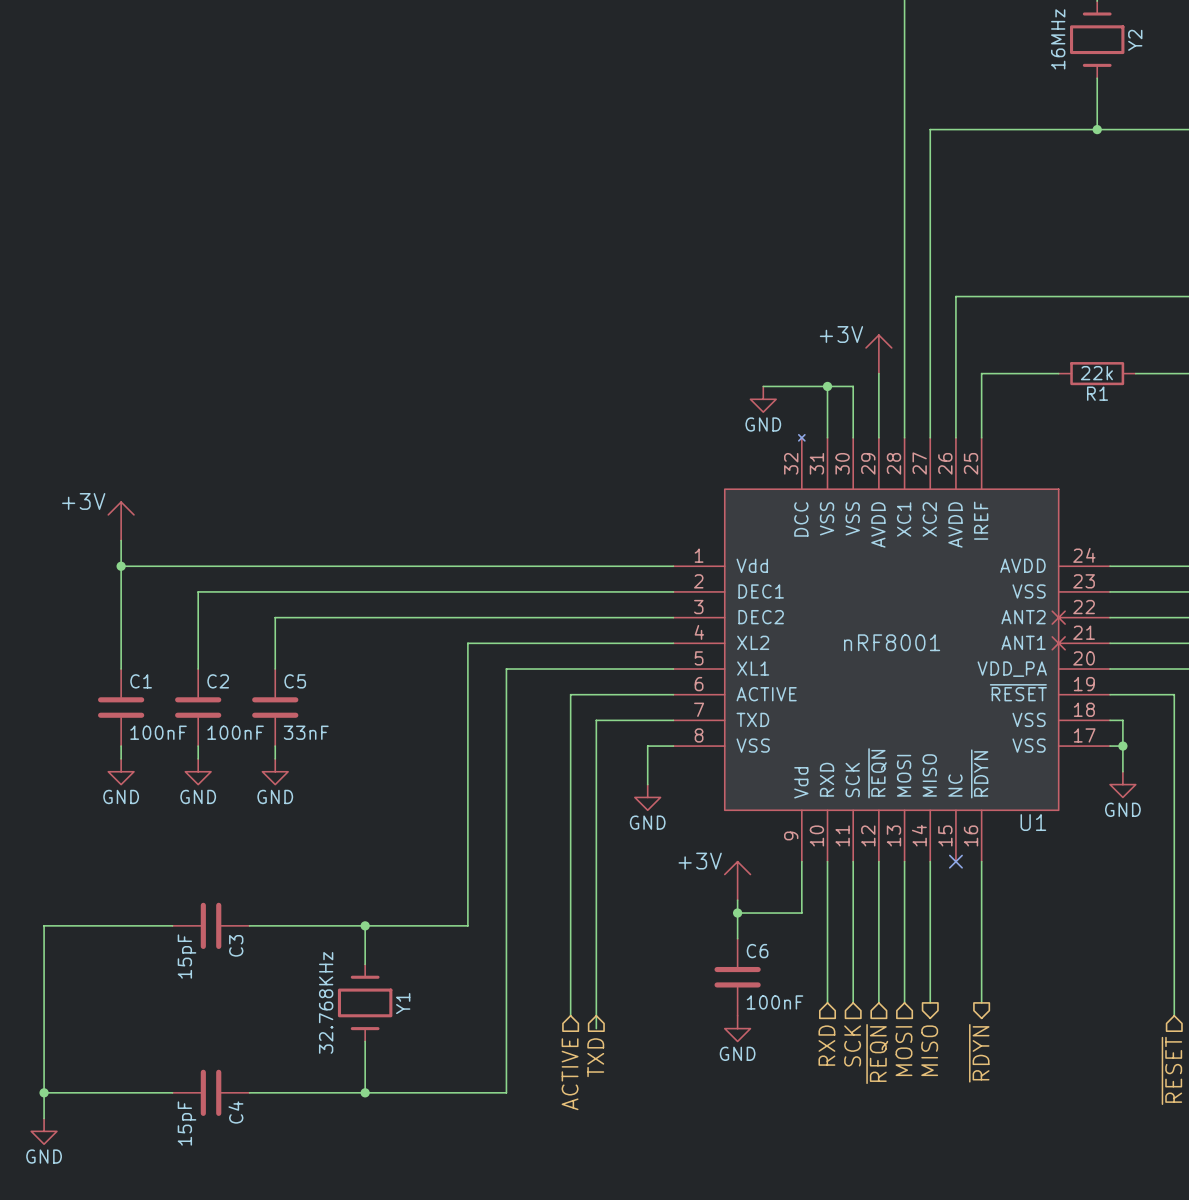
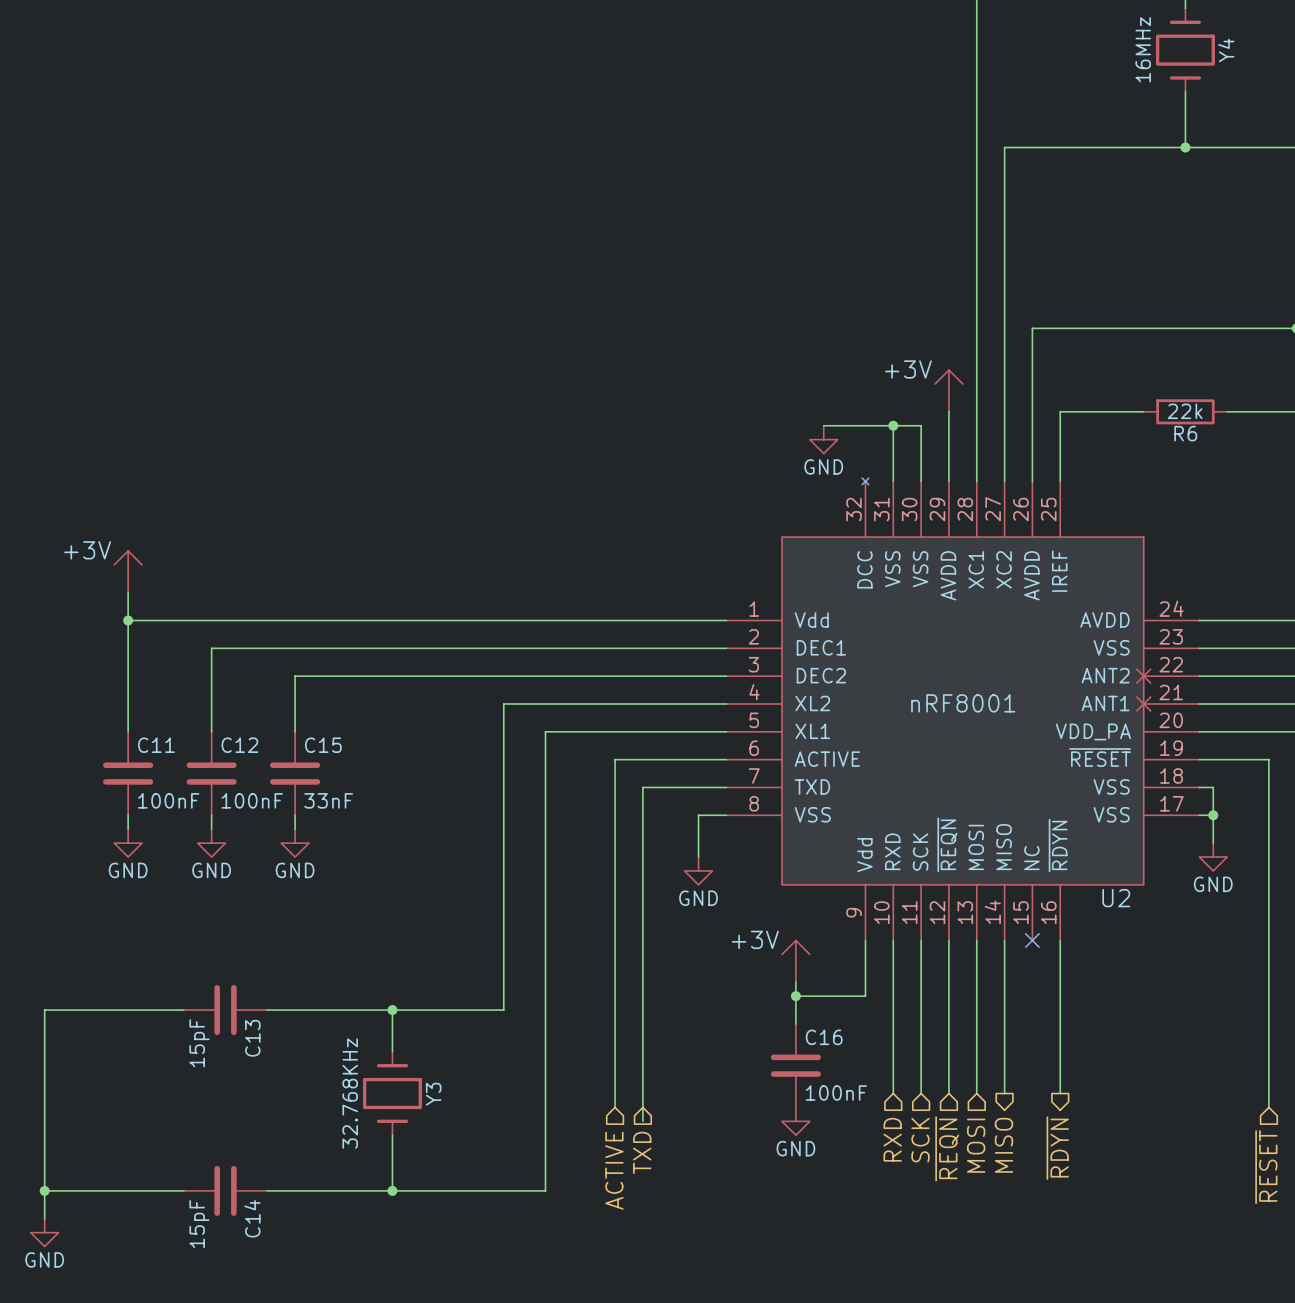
Y2 name: Y2 (1135, 40) -> Y4 (1226, 50)
R1 name: R1 (1097, 393) -> R6 (1185, 433)
C1 name: C1 (141, 681) -> C11 (156, 745)
C2 name: C2 (218, 681) -> C12 (239, 745)
C5 name: C5 (295, 681) -> C15 (323, 745)
U1 name: U1 (1033, 822) -> U2 (1116, 898)
C3 name: C3 (236, 945) -> C13 (252, 1038)
C6 name: C6 (757, 951) -> C16 (824, 1037)
Y1 name: Y1 (403, 1003) -> Y3 (433, 1094)
C4 name: C4 (235, 1112) -> C14 (252, 1218)

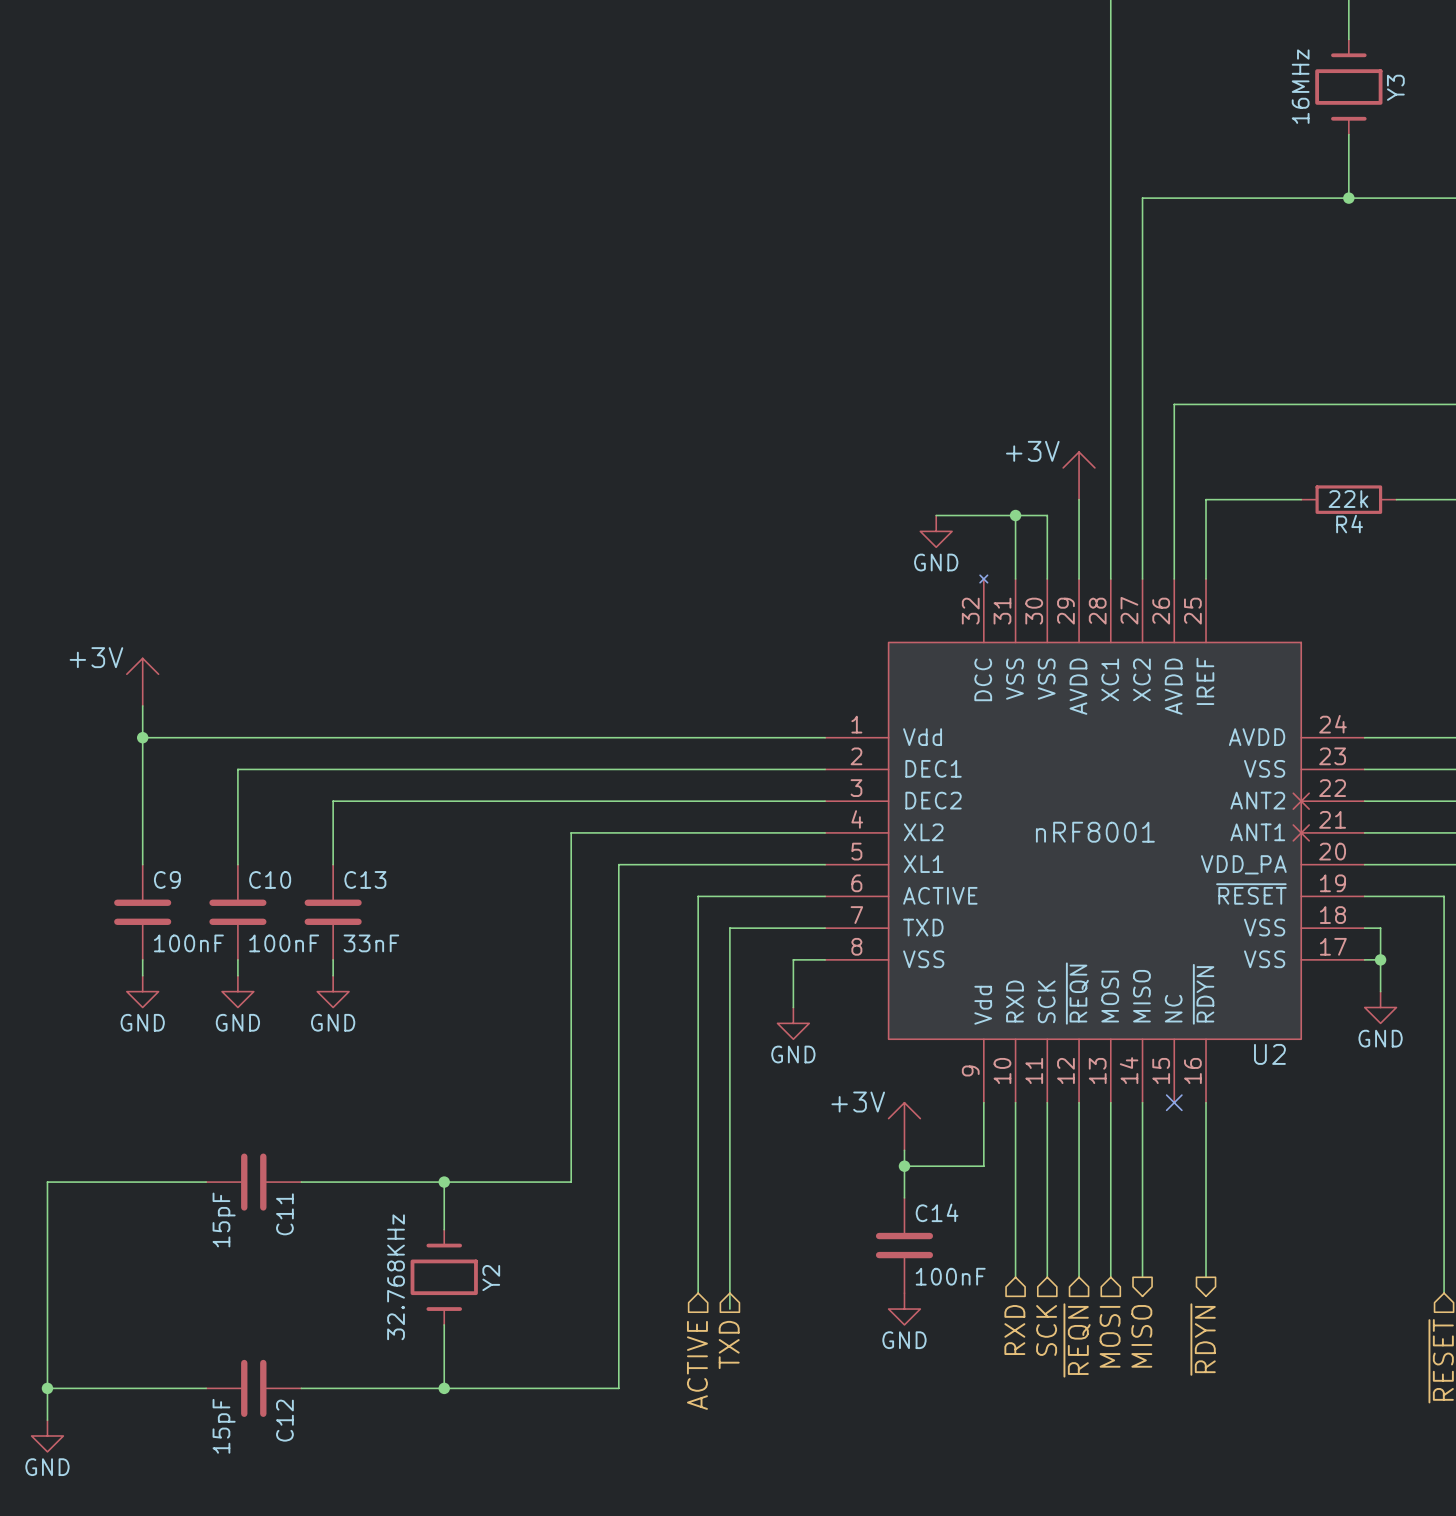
Y4 name: Y4 (1226, 50) -> Y3 (1395, 87)
R6 name: R6 (1185, 433) -> R4 (1349, 524)
C11 name: C11 (156, 745) -> C9 (167, 879)
C12 name: C12 (239, 745) -> C10 (270, 879)
C15 name: C15 (323, 745) -> C13 (365, 879)
C16 name: C16 (824, 1037) -> C14 (937, 1212)
C13 name: C13 (252, 1038) -> C11 (284, 1214)
Y3 name: Y3 (433, 1094) -> Y2 (491, 1278)
C14 name: C14 (252, 1218) -> C12 (284, 1420)

